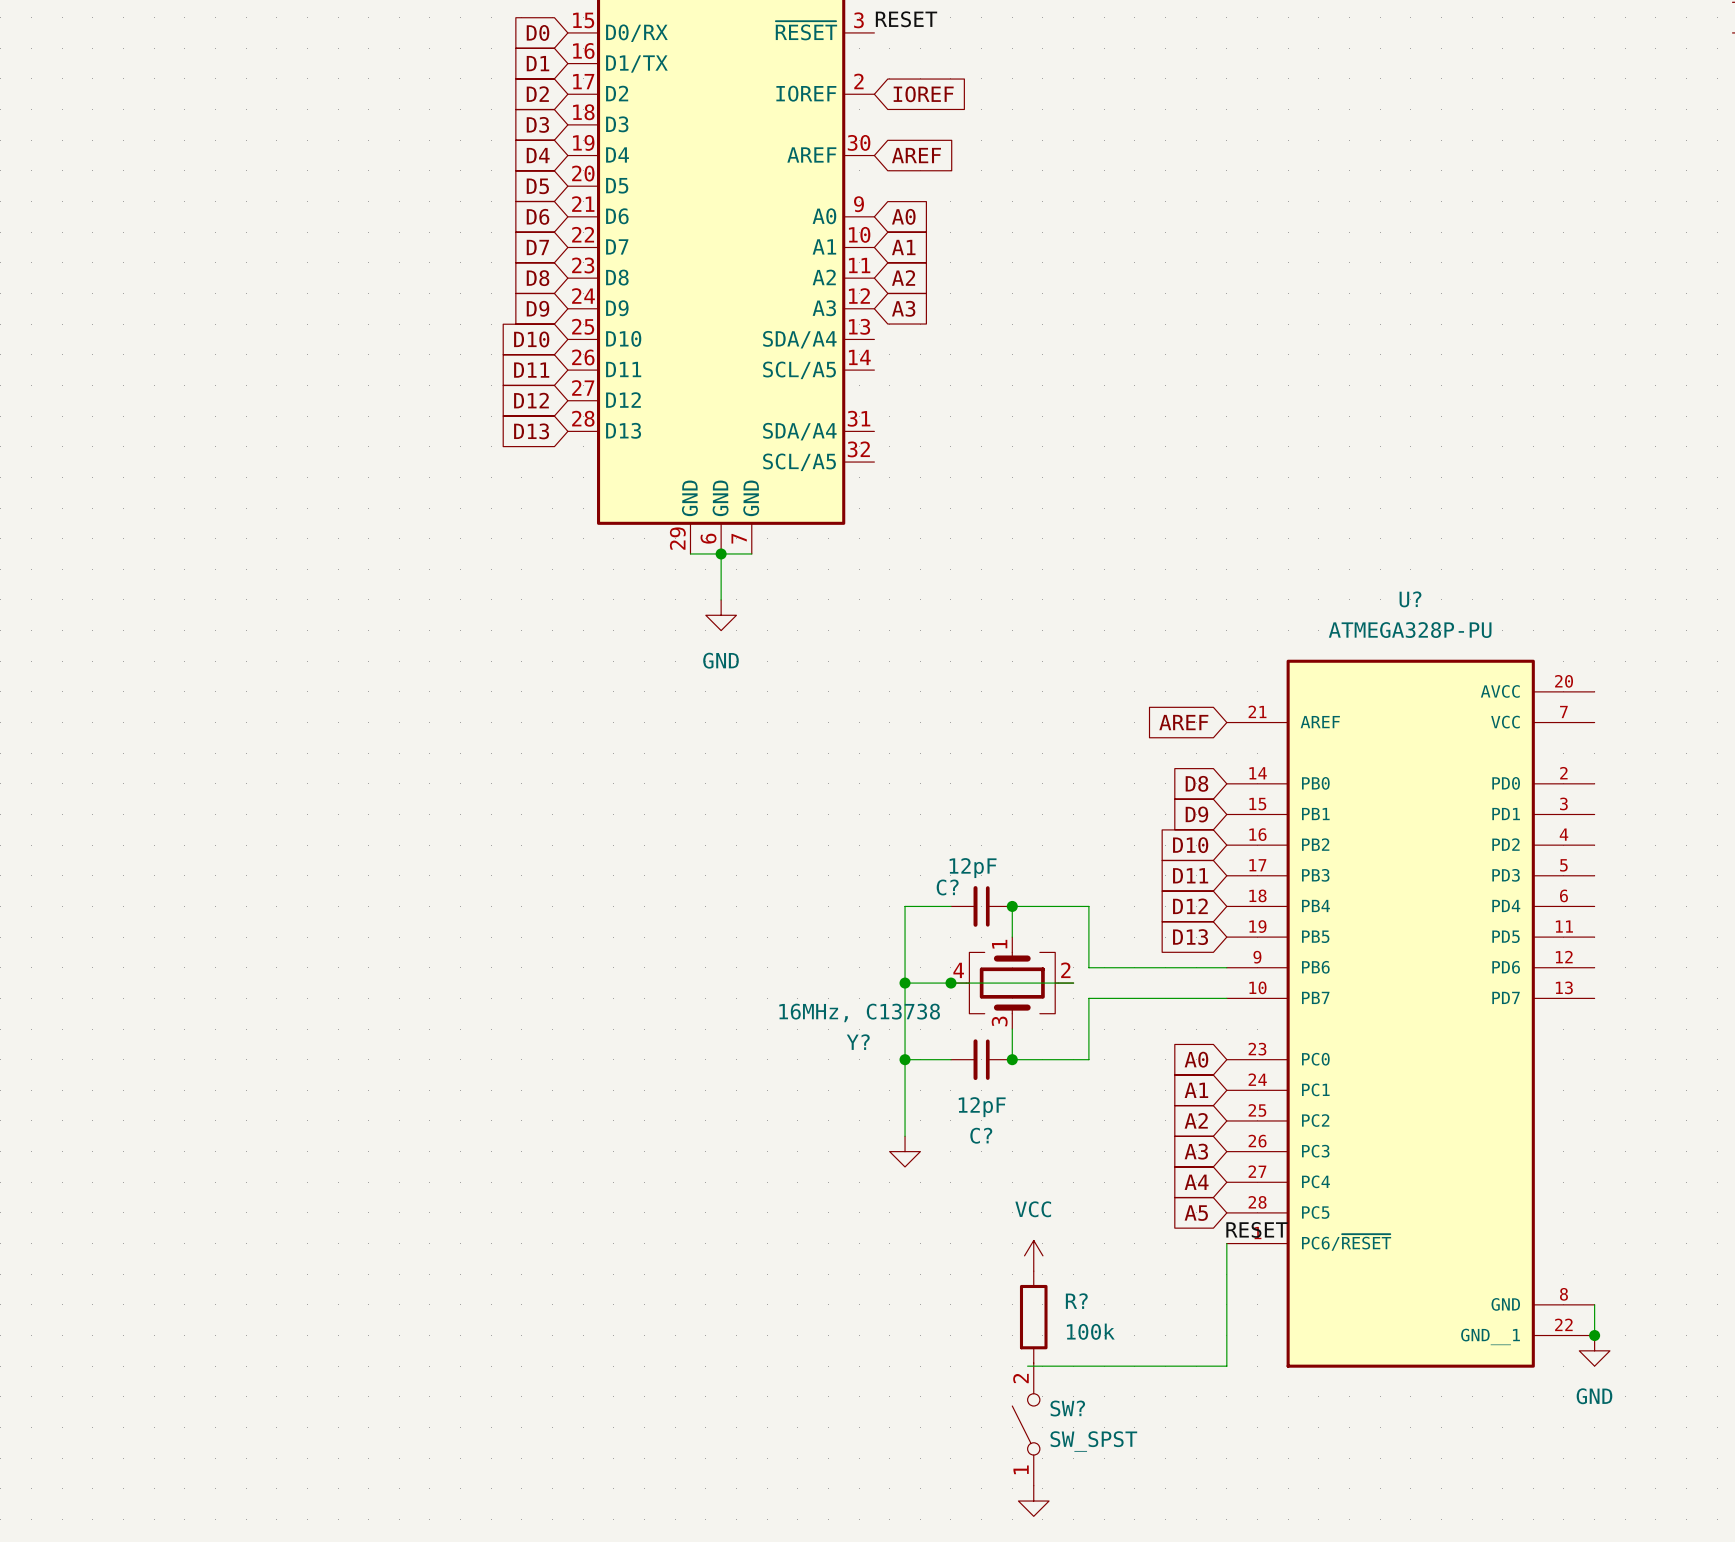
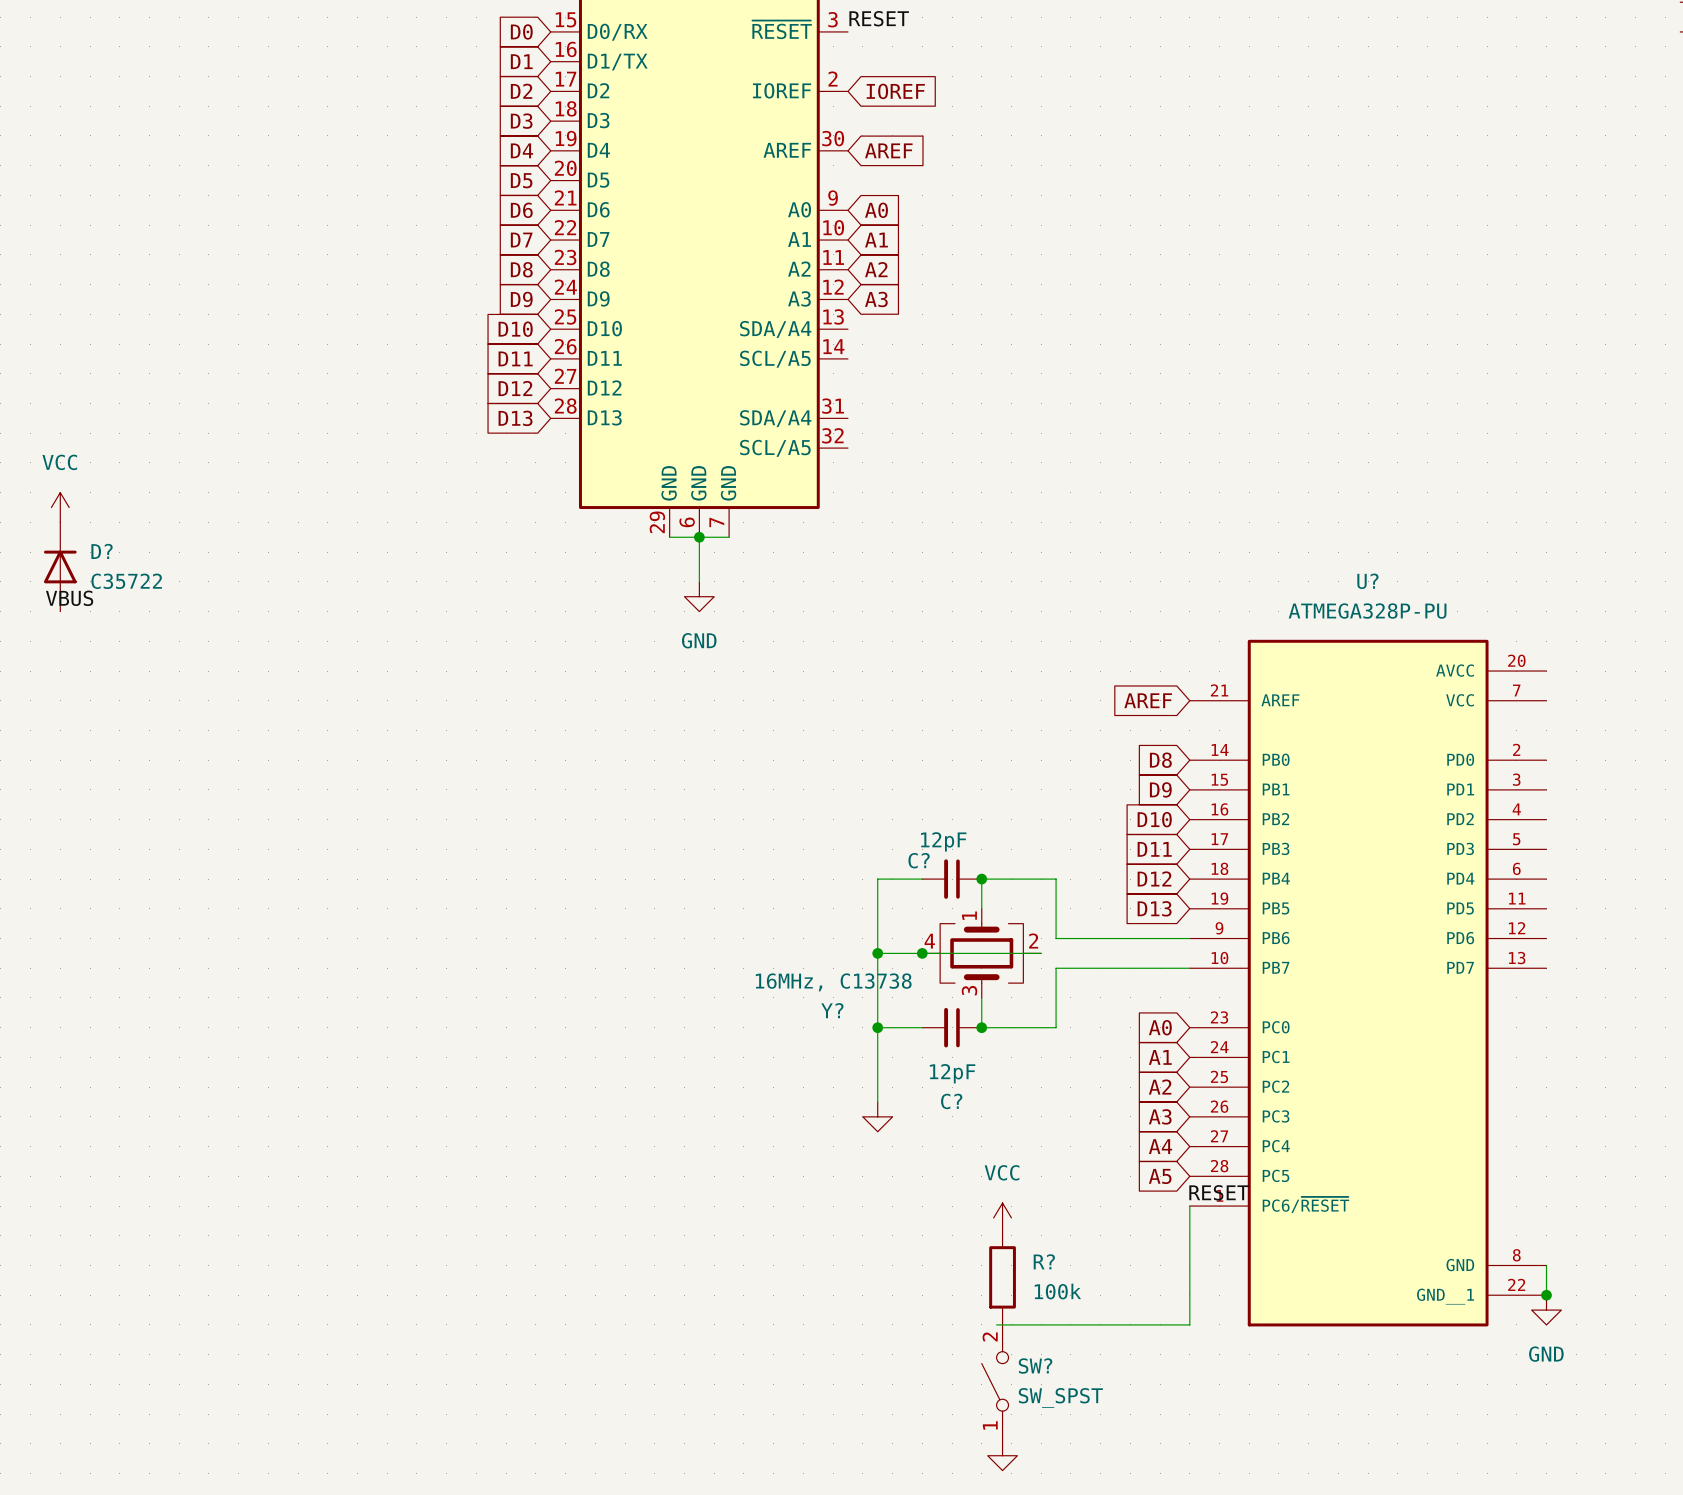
power symbol: none -> VCC (60, 507)
D?: none -> C35722 (60, 566)
label: none -> VBUS (69, 598)

